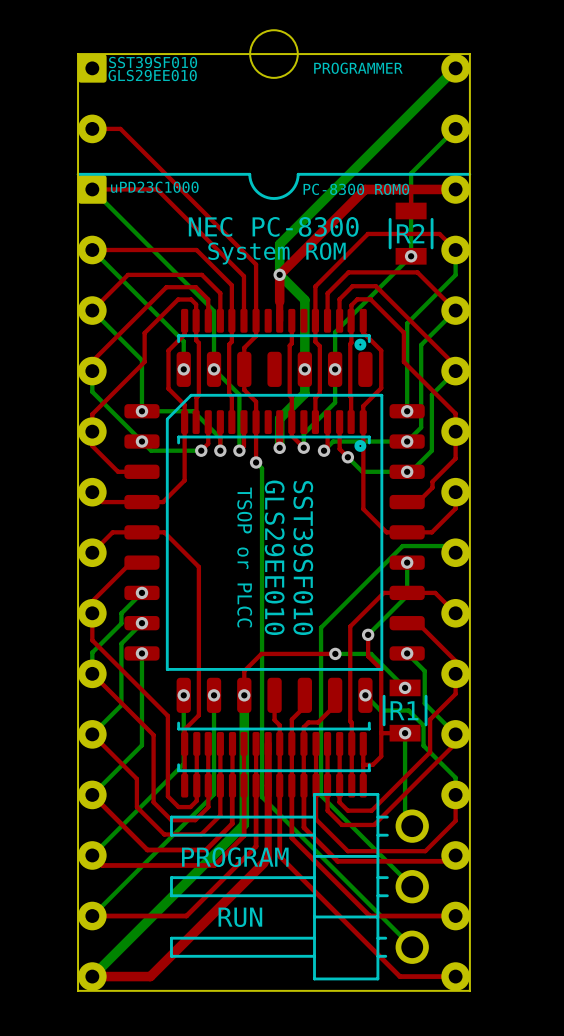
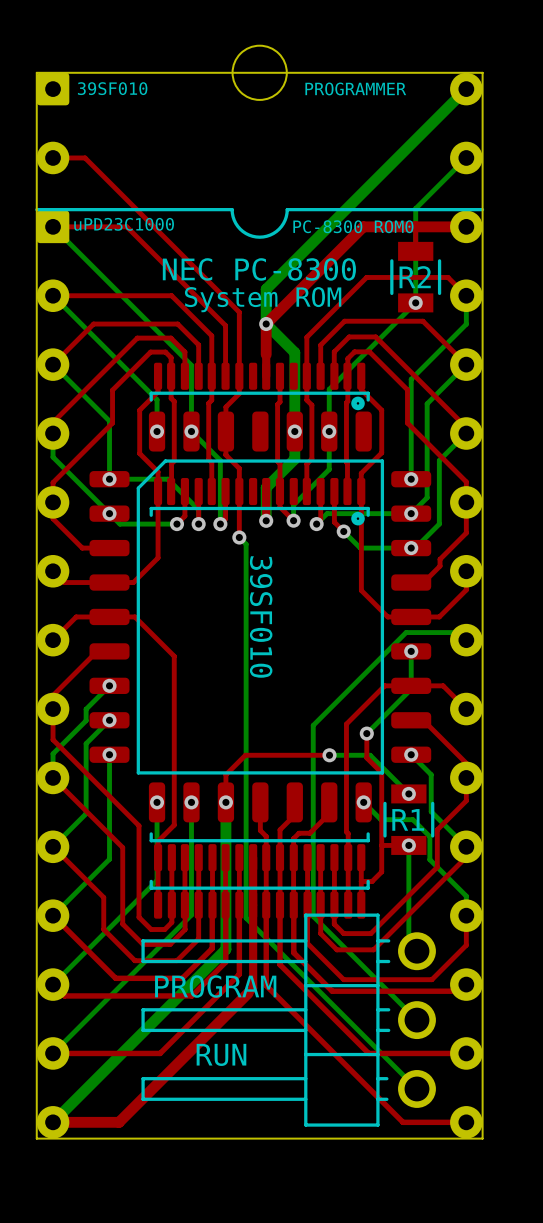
text: SST39SF010 (153, 62) -> 39SF010 (112, 88)
text: GLS29EE010 (152, 75) -> none
text: TSOP or PLCC (244, 557) -> none
text: GLS29EE010 (274, 557) -> none
text: SST39SF010 (303, 558) -> 39SF010 (261, 616)

